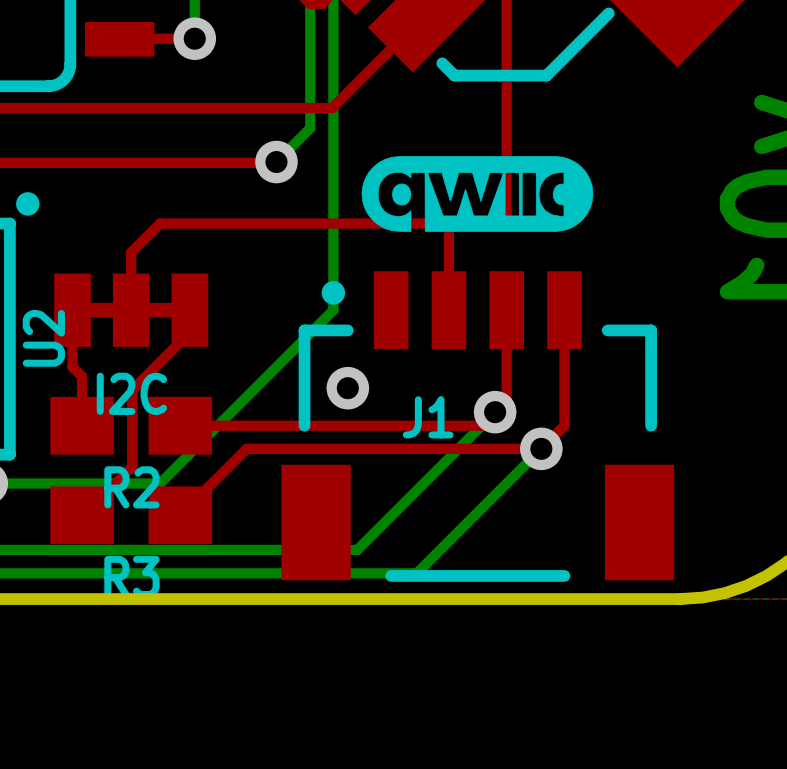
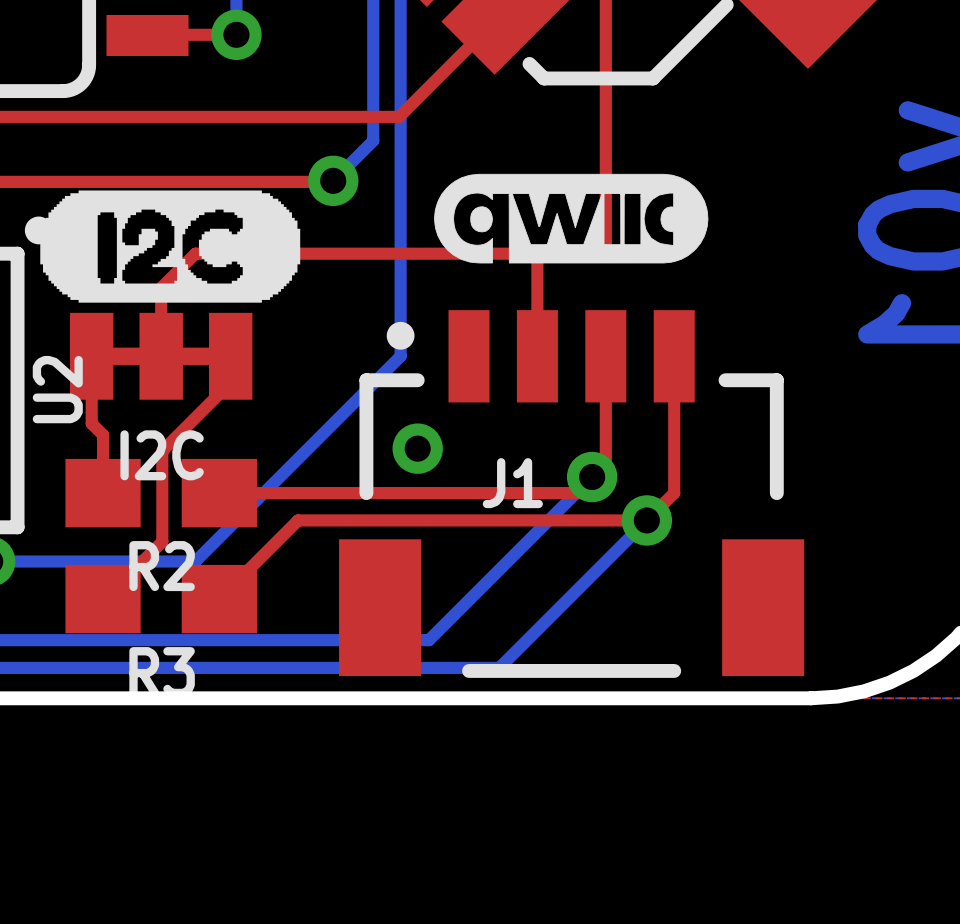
drawing: none -> [40, 190, 301, 303]

